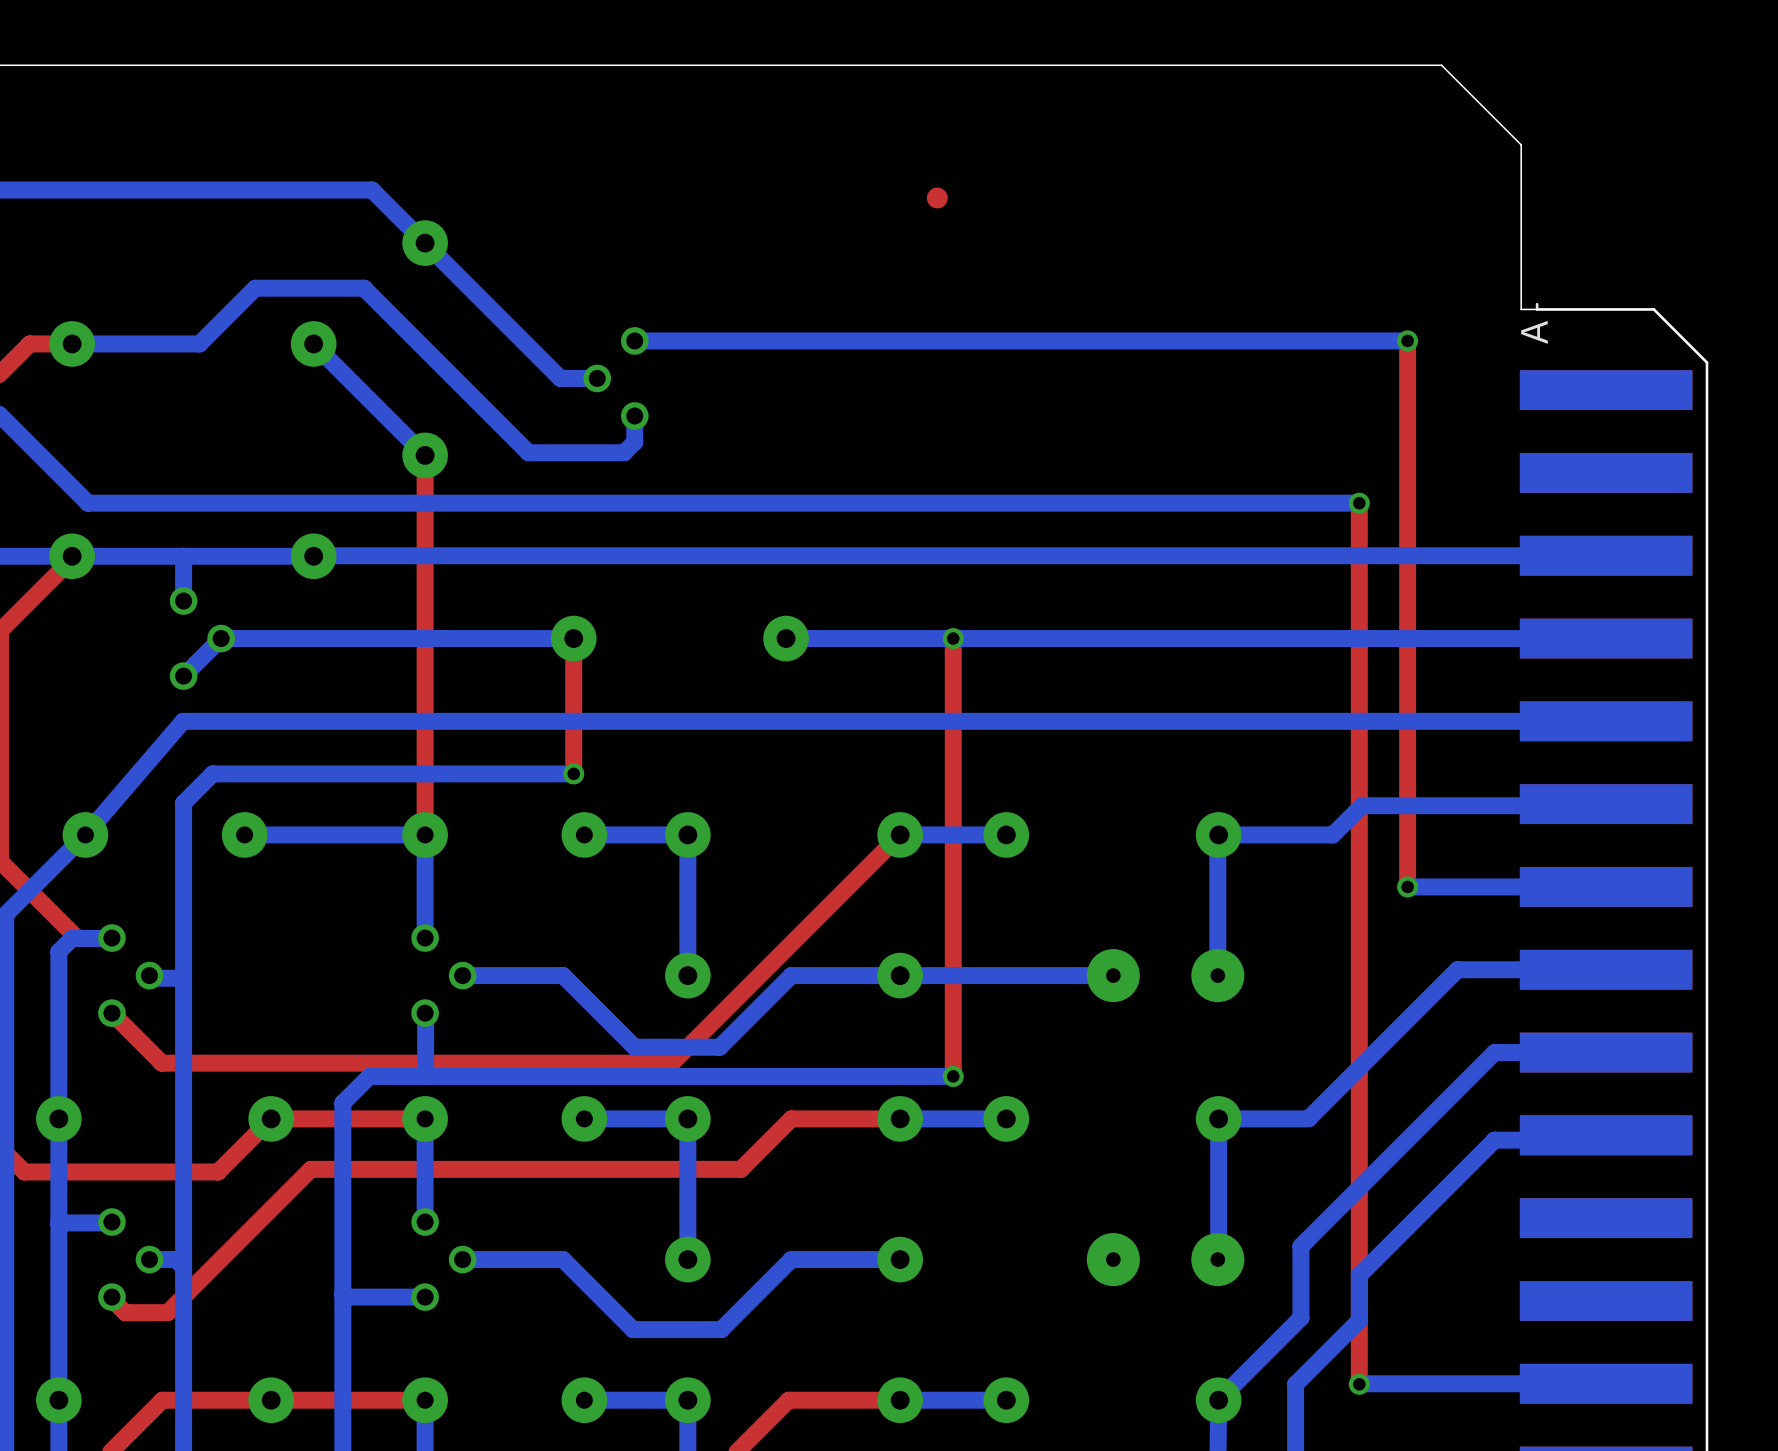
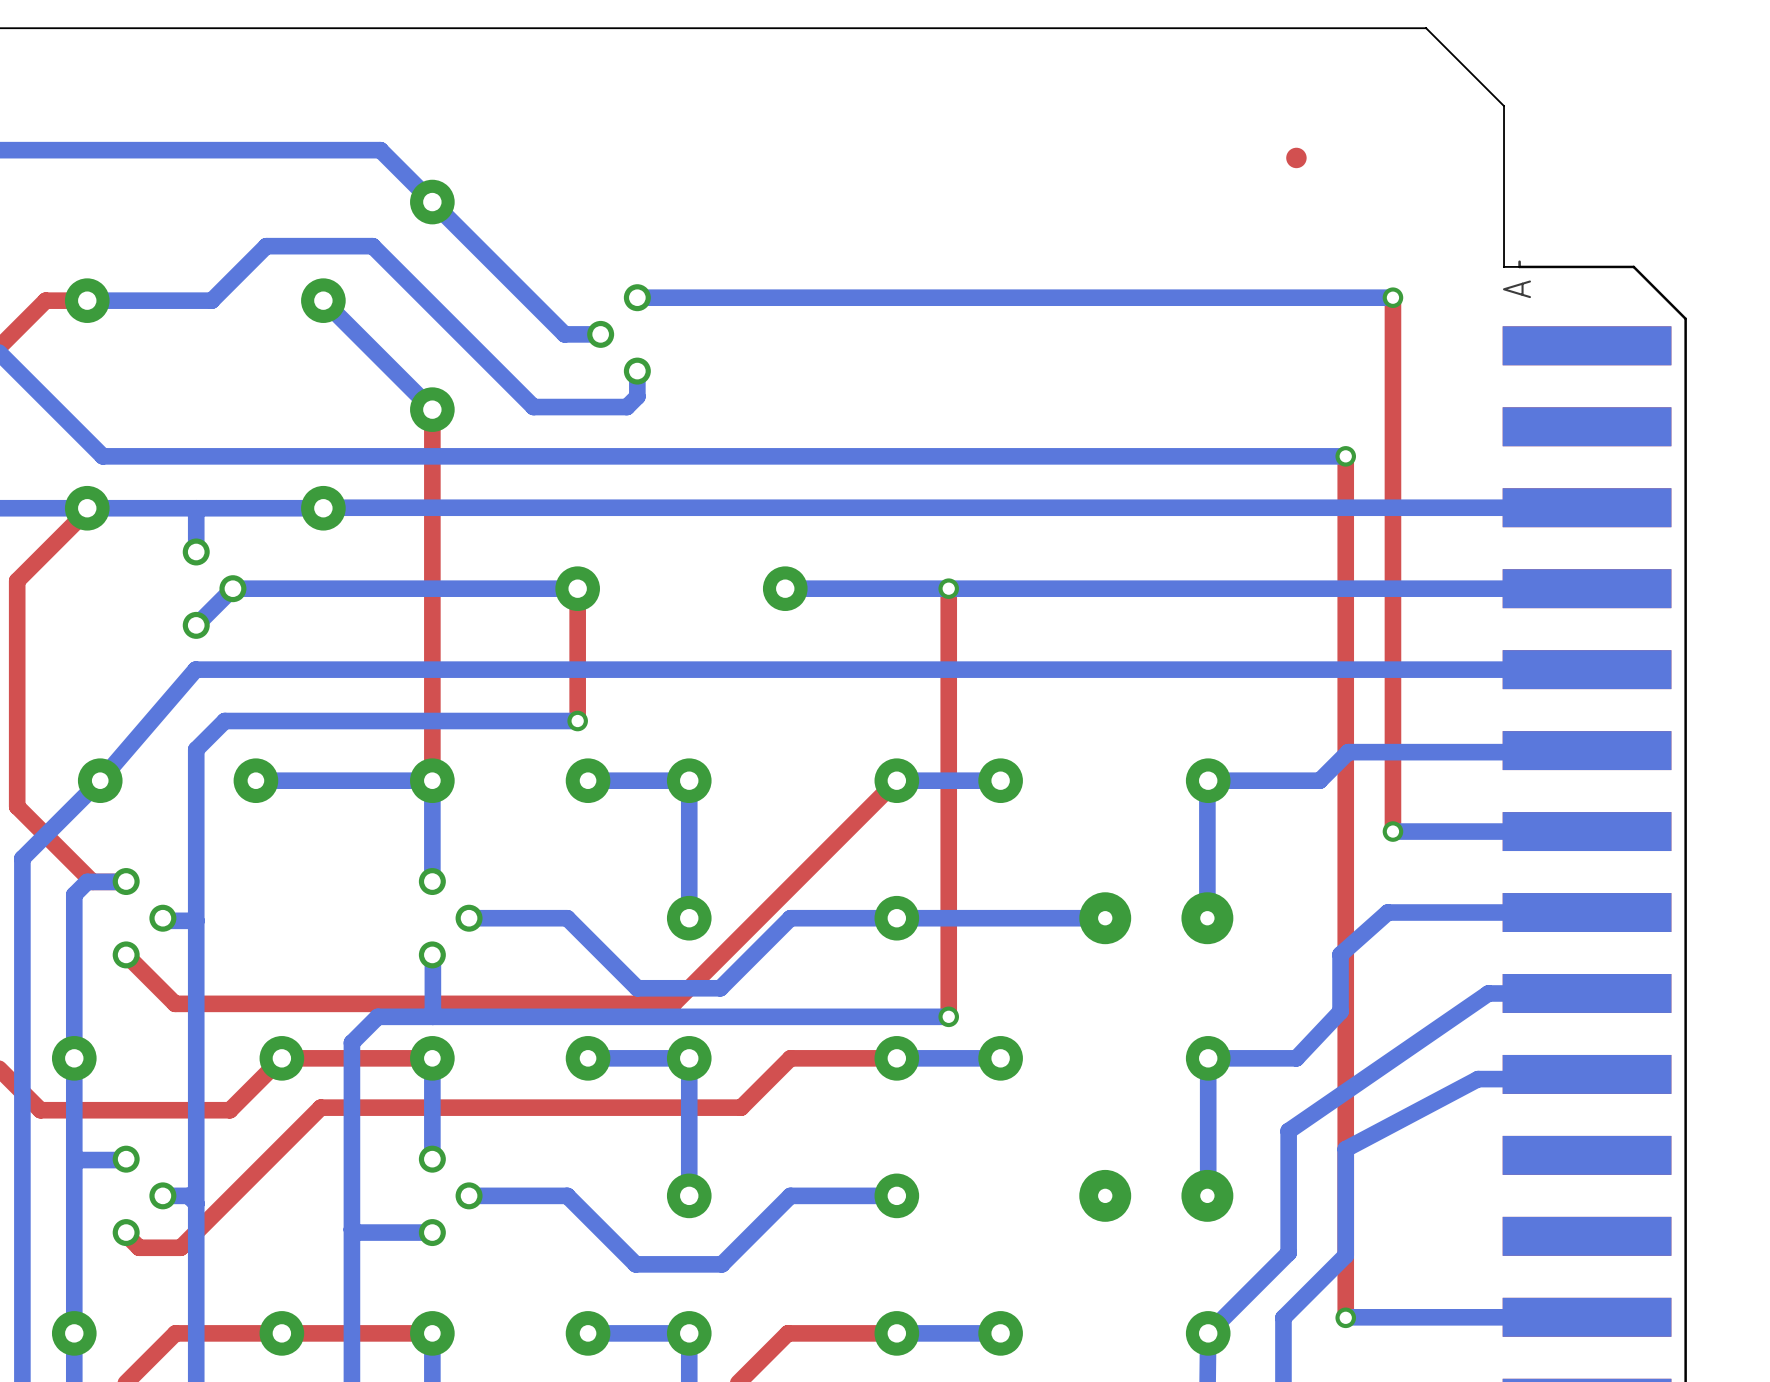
part position: (937, 197) -> (1296, 157)
bottom track: (1457, 969) (1308, 1118) -> (1441, 912) (1387, 912) (1340, 954) (1340, 1011) (1296, 1058)
bottom track: (1505, 1052) (1494, 1052) (1300, 1246) -> (1488, 993) (1288, 1130) (1288, 1182)
bottom track: (1494, 1140) (1359, 1275) -> (1478, 1079) (1345, 1149) (1345, 1211)

